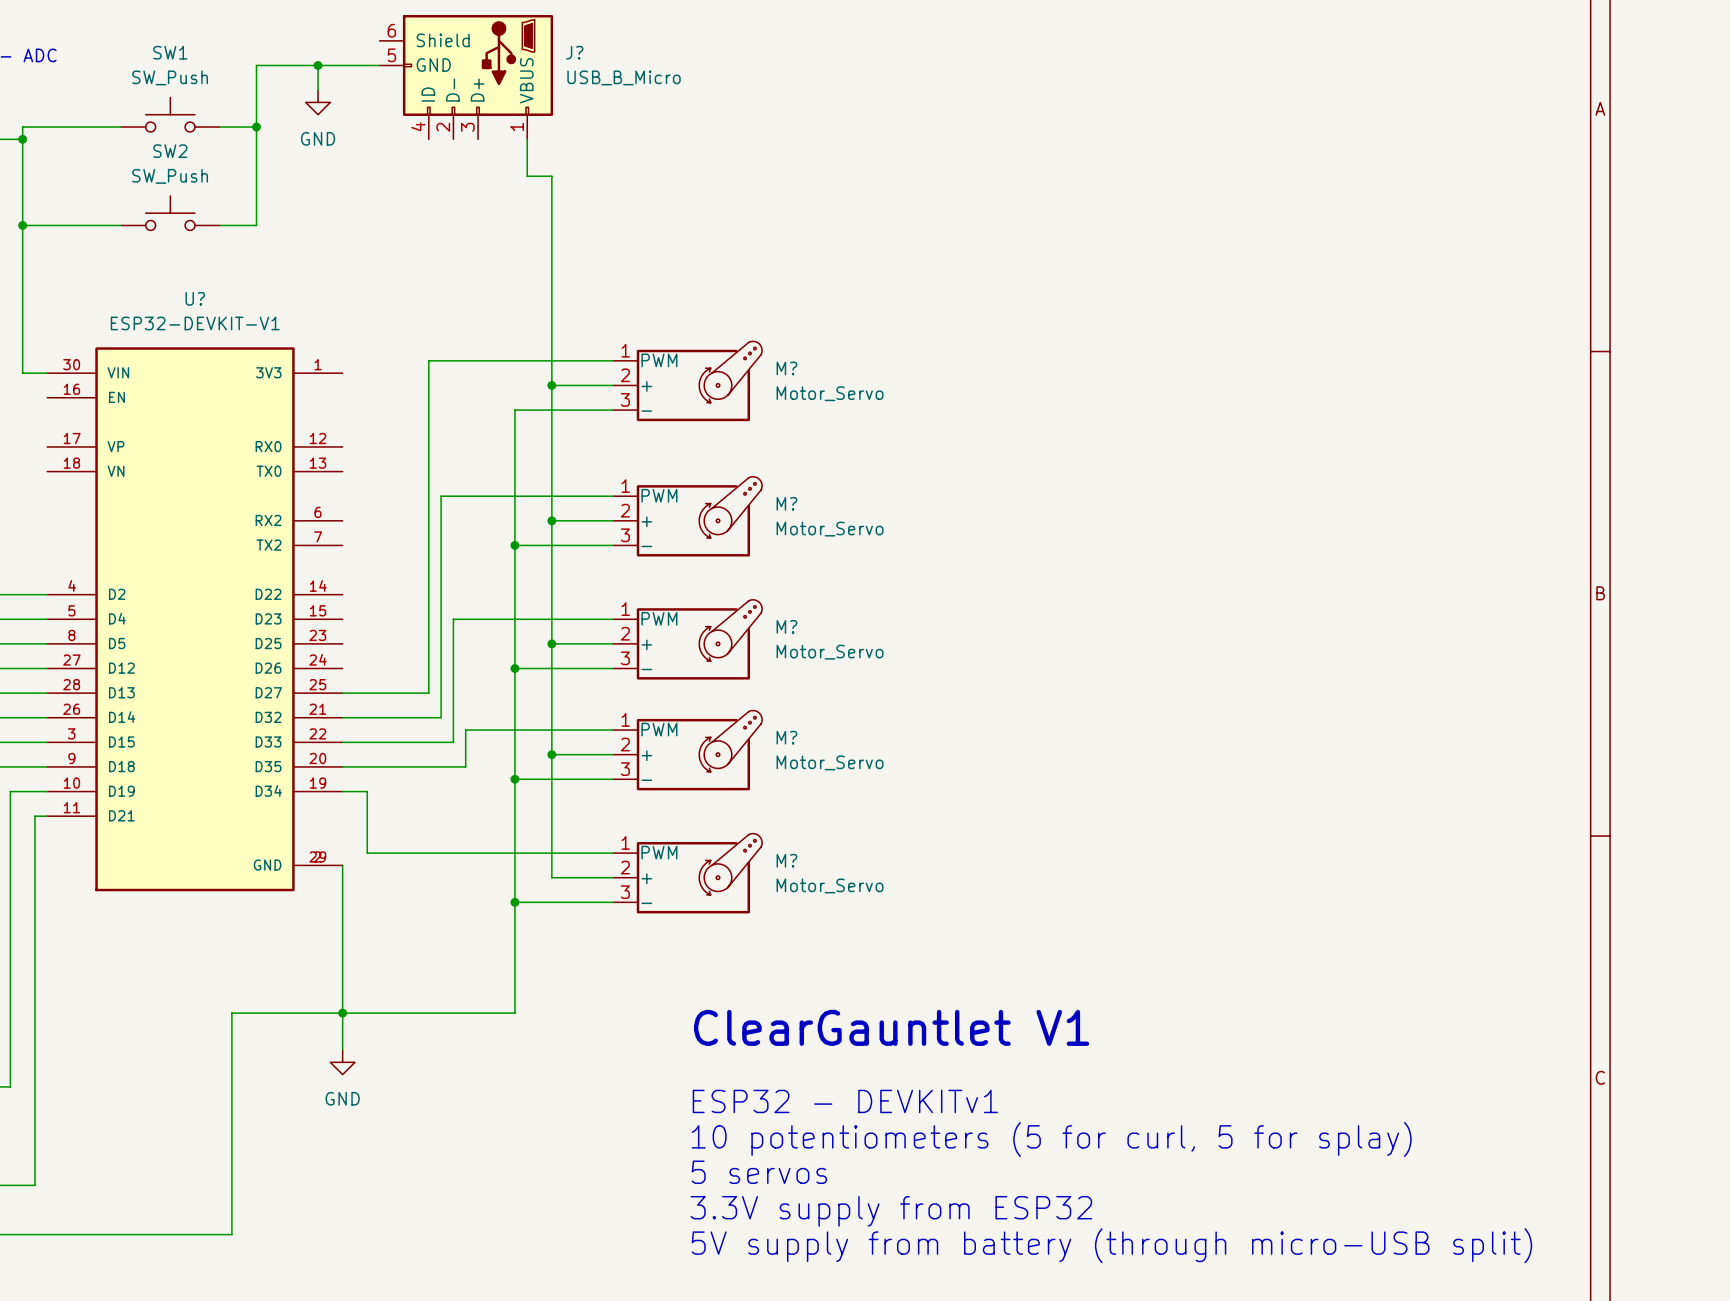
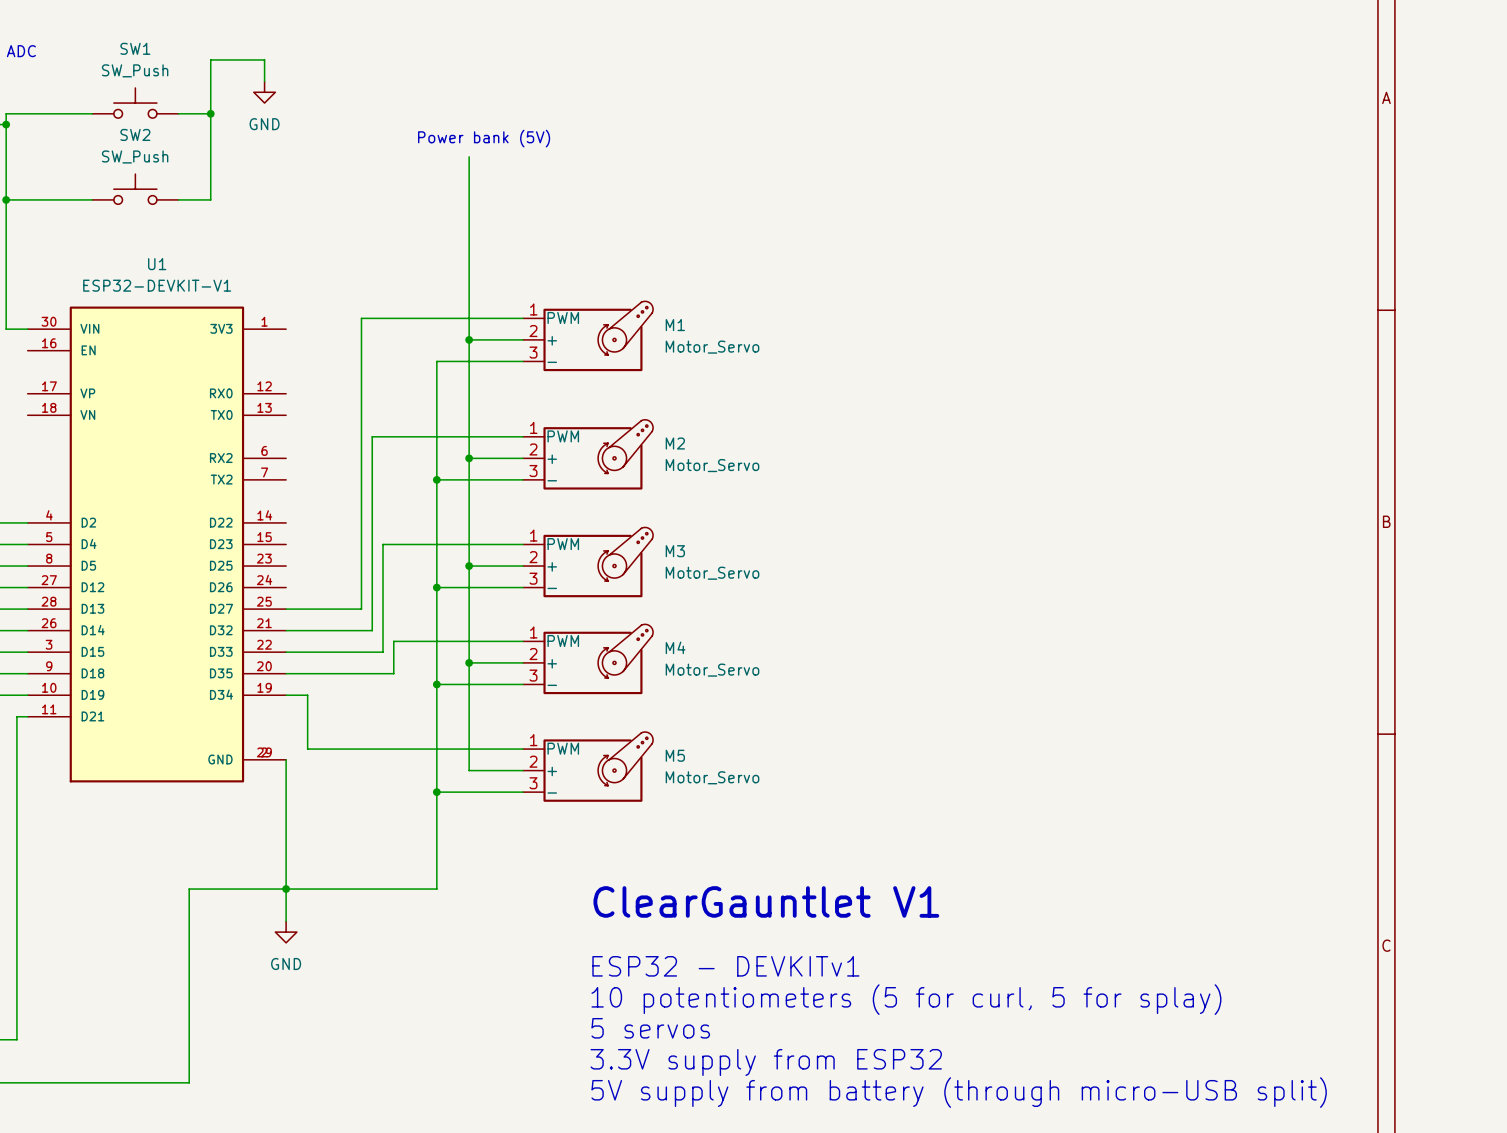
wire: (318, 65) (379, 65) -> none
junction: (318, 65) -> none
J?: USB_B_Micro (466, 77) -> none
wire: (527, 139) (527, 176) (551, 176) -> none
text: none -> Power bank (5V) (484, 138)
U? name: U? (195, 298) -> U1 (157, 264)
M? name: M? (786, 368) -> M1 (675, 325)
M? name: M? (786, 503) -> M2 (675, 443)
M? name: M? (786, 626) -> M3 (675, 551)
M? name: M? (786, 737) -> M4 (675, 647)
M? name: M? (786, 860) -> M5 (675, 755)

